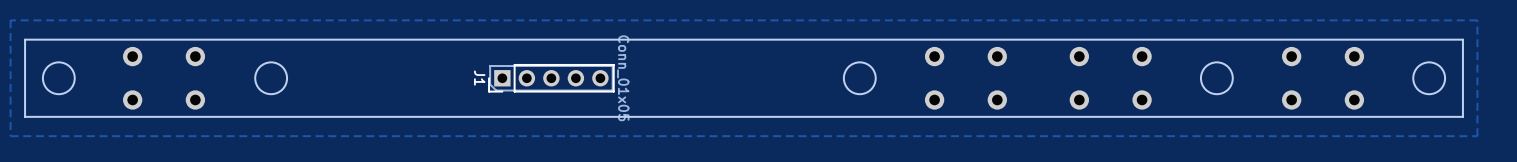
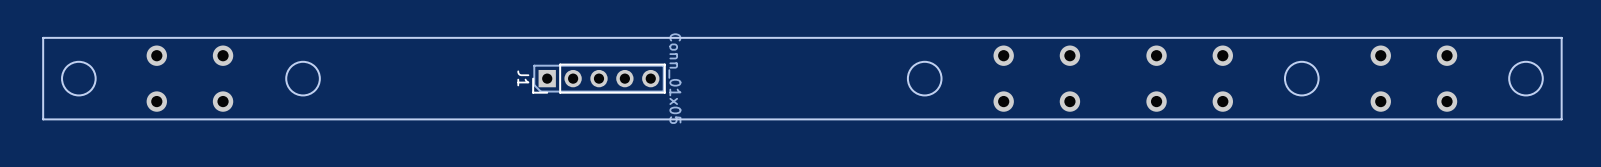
zone outline: (1477, 20) (10, 20) (10, 136) (1477, 136) (1477, 20) -> none

